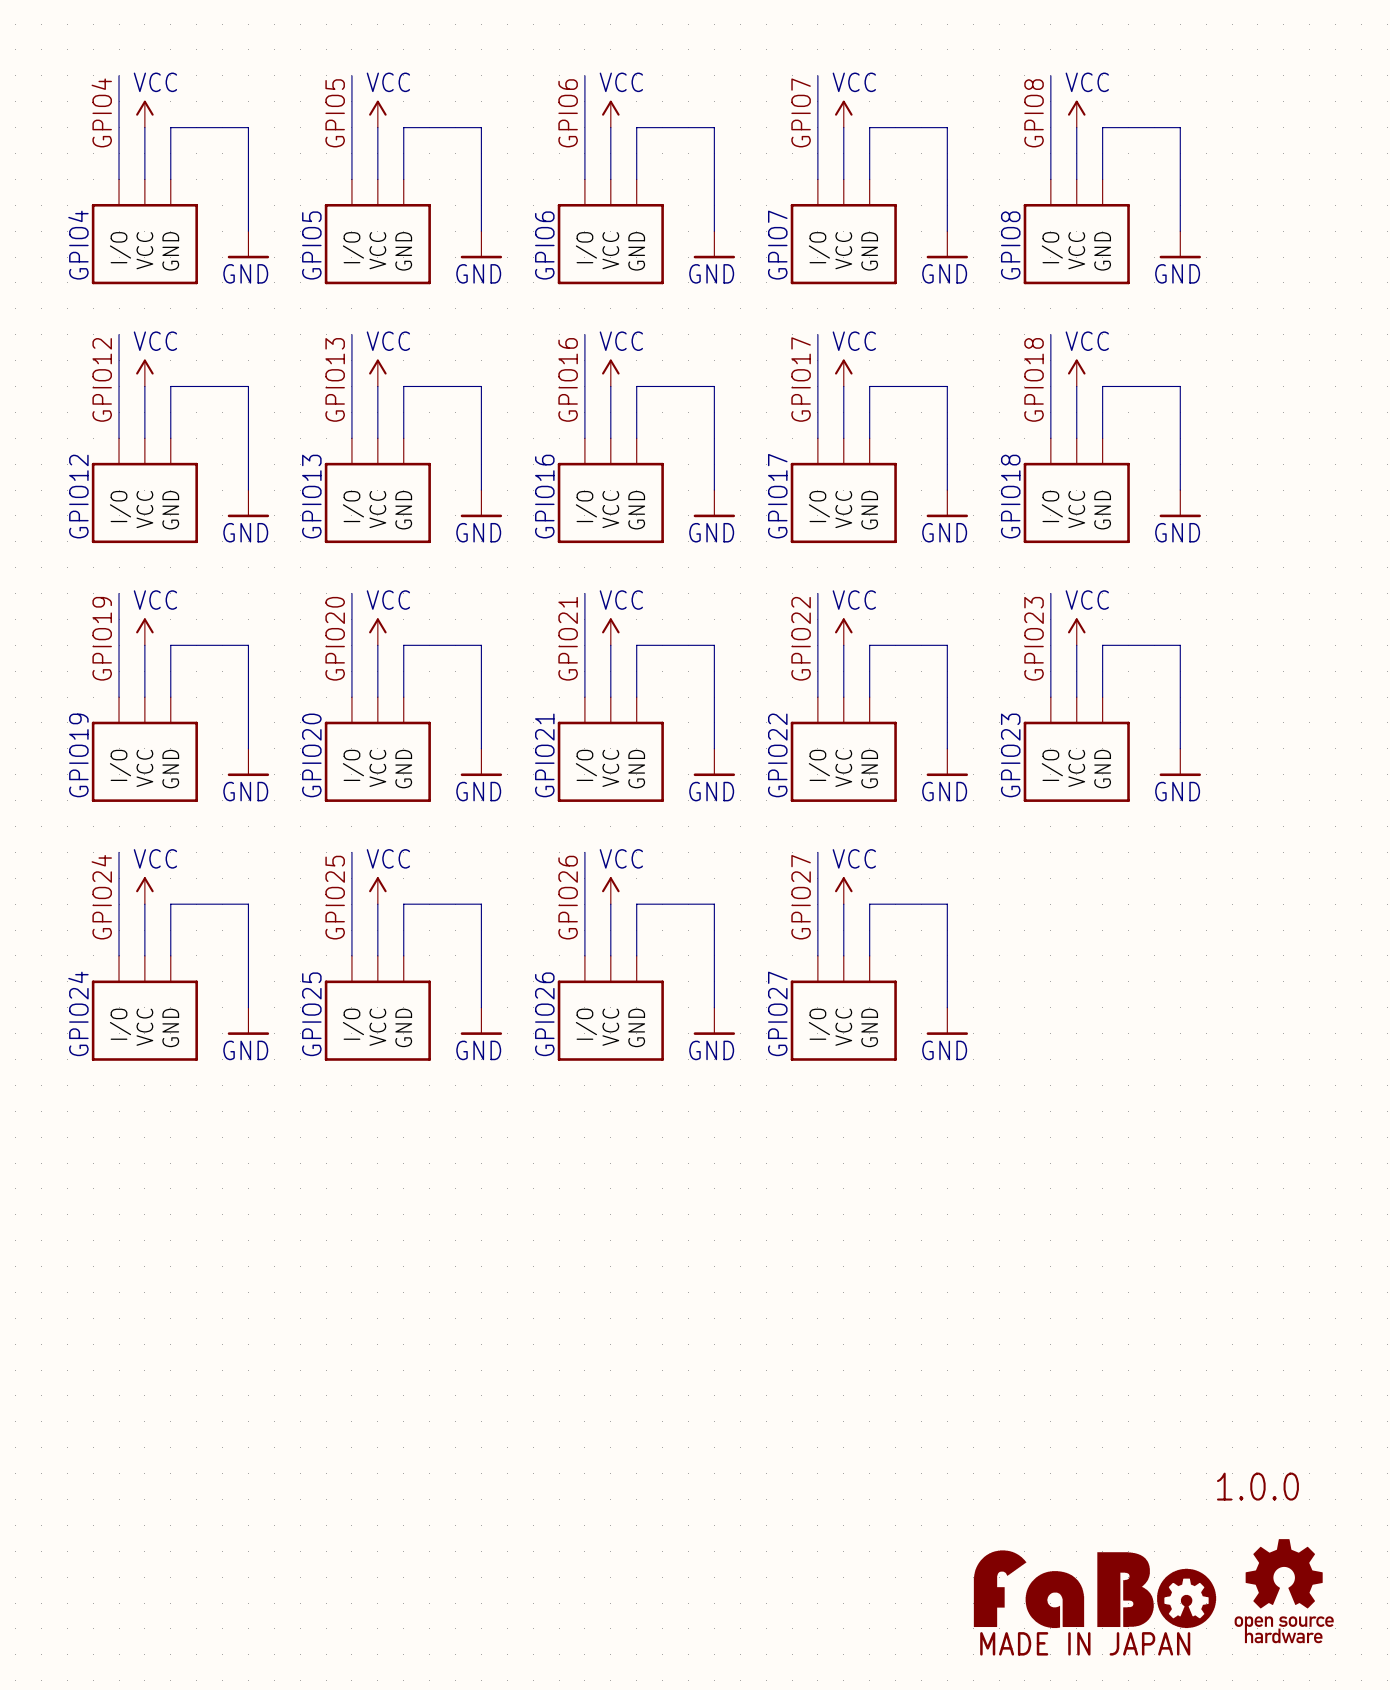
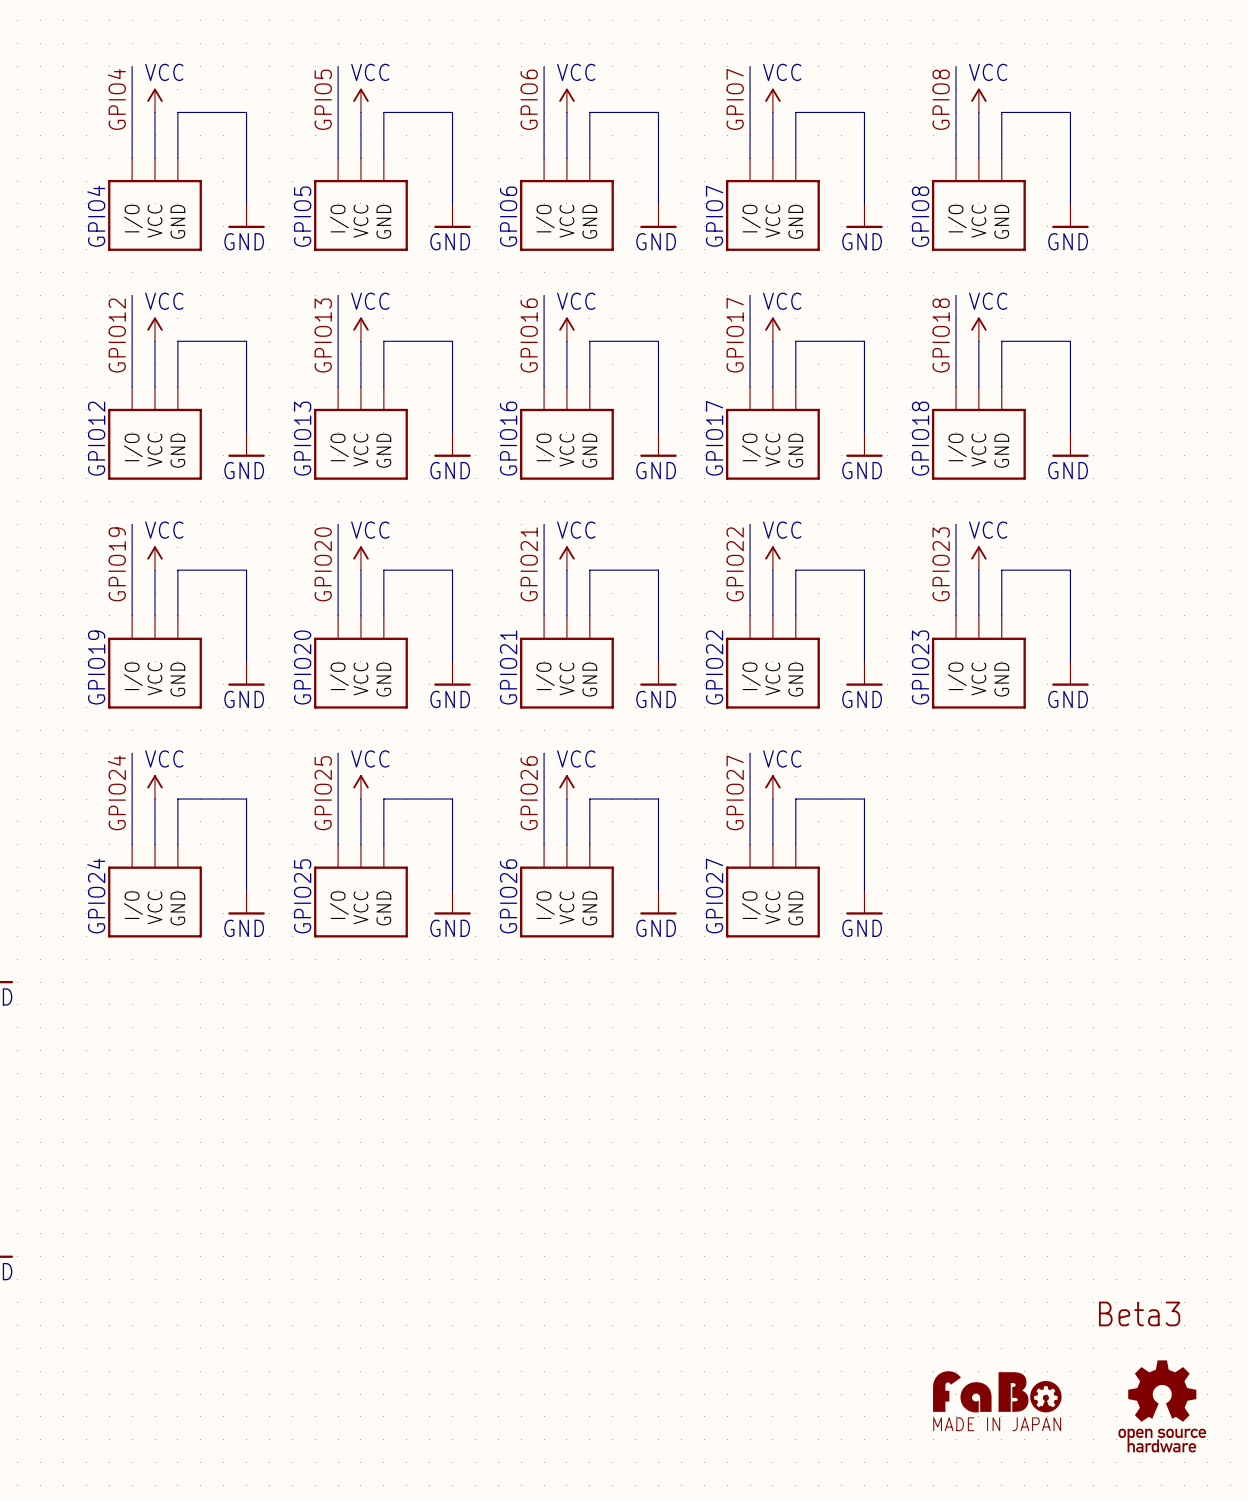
text: 1.0.0 (1257, 1486) -> Beta3 (1139, 1313)
part: none -> (997, 1391)
part: (1095, 1589) -> none
text: none -> MADE IN JAPAN (997, 1424)

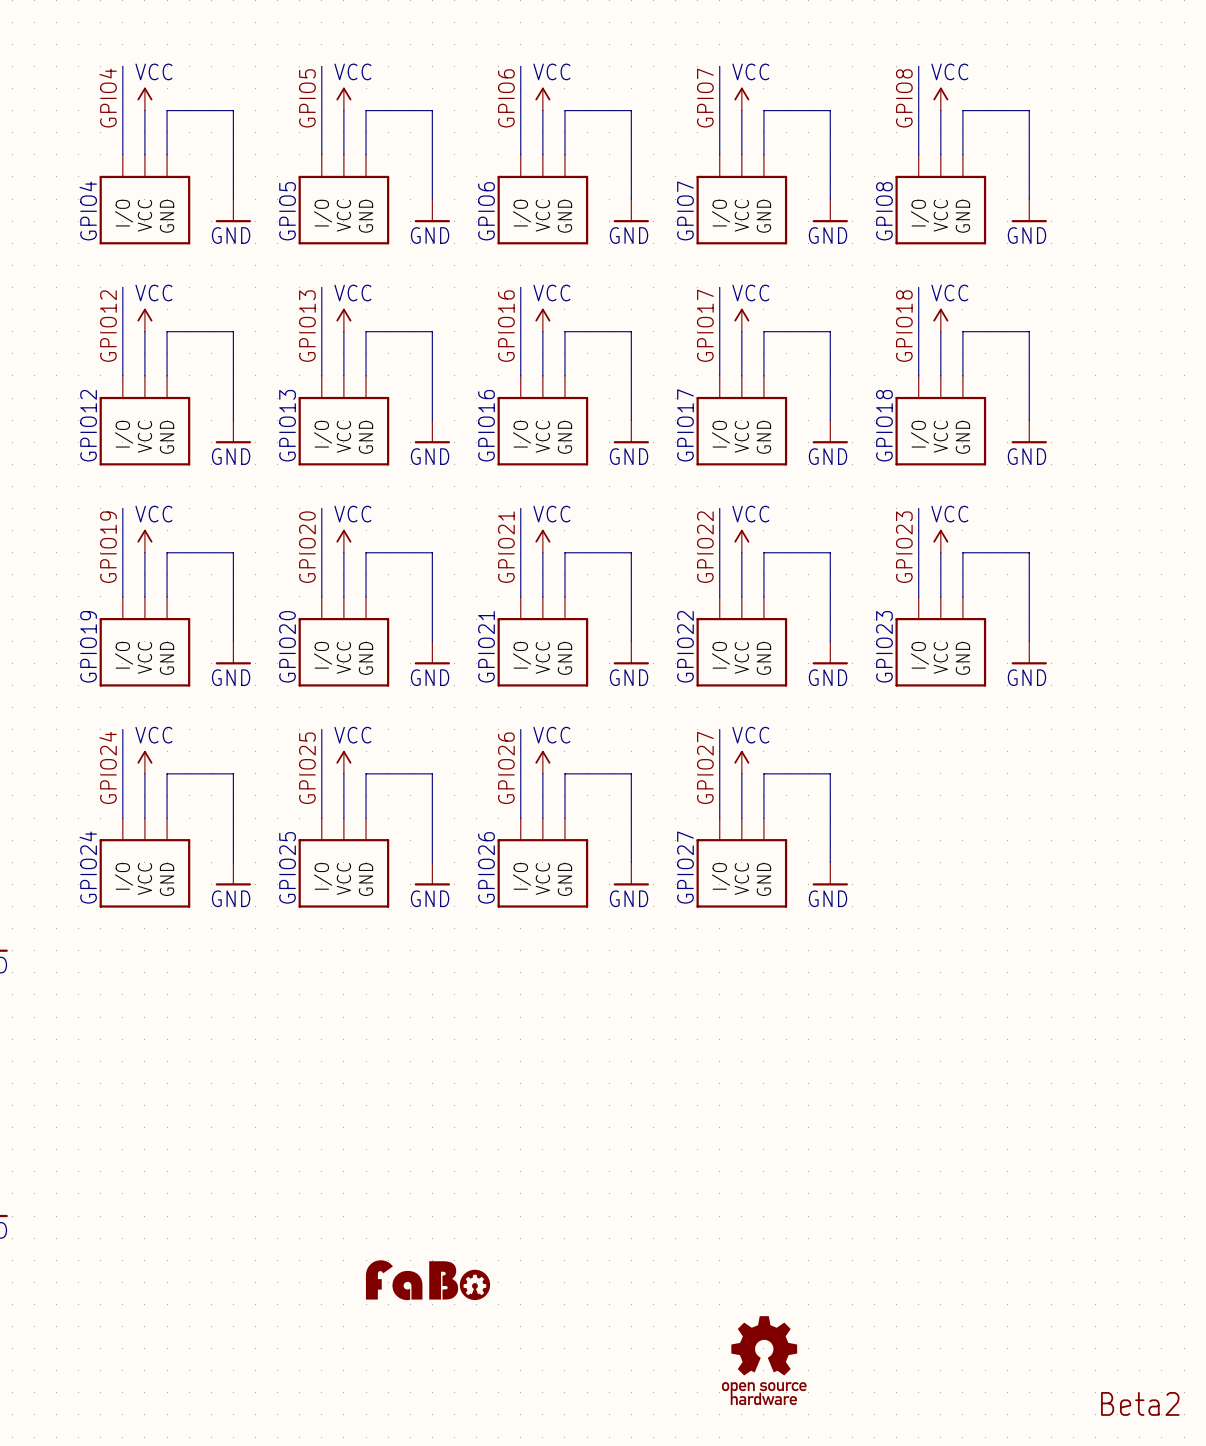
text: Beta3 (1139, 1313) -> none
part: none -> (428, 1280)
part: (997, 1391) -> none
part: none -> (764, 1360)
part: (1162, 1406) -> none
text: MADE IN JAPAN (997, 1424) -> none
text: none -> Beta2 (1140, 1403)

